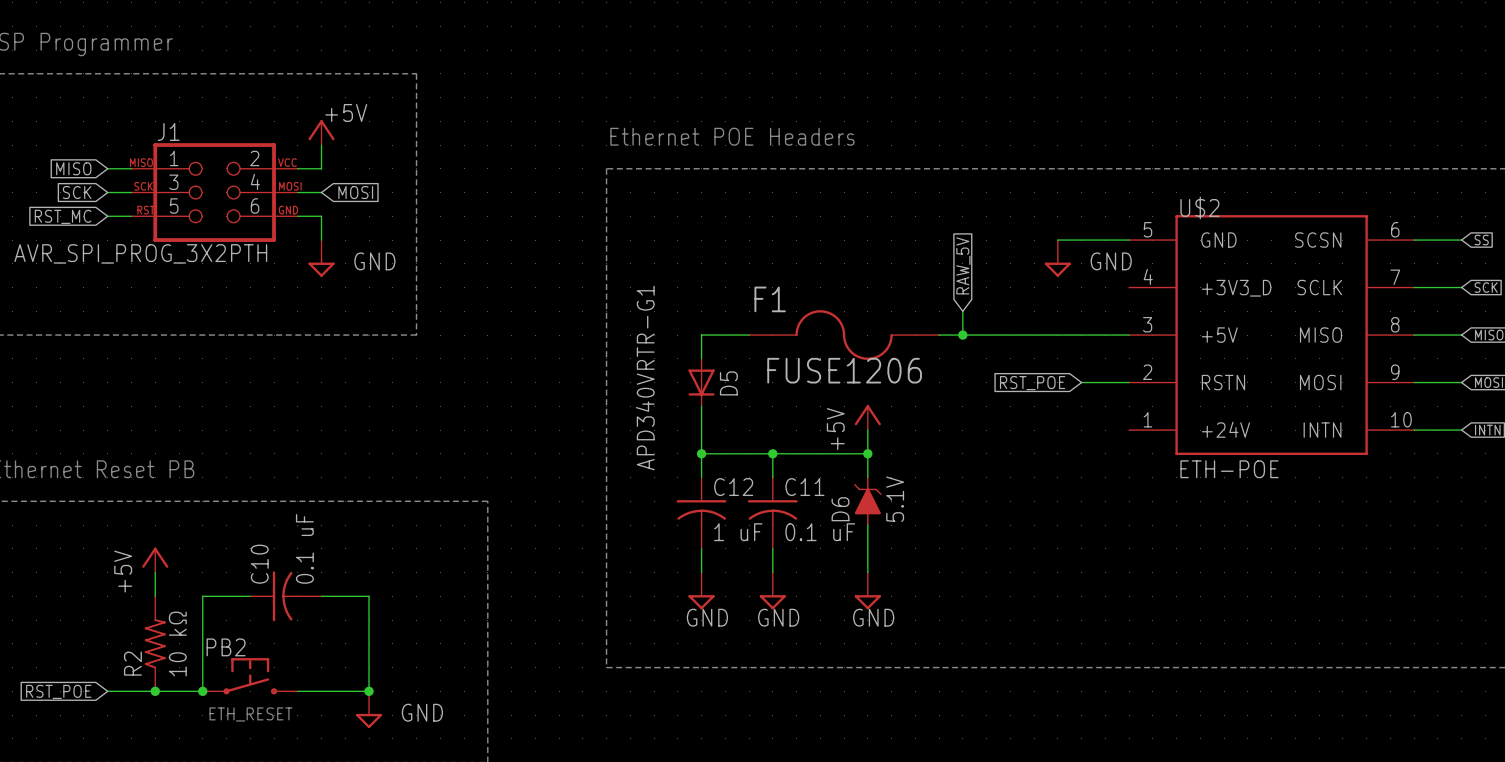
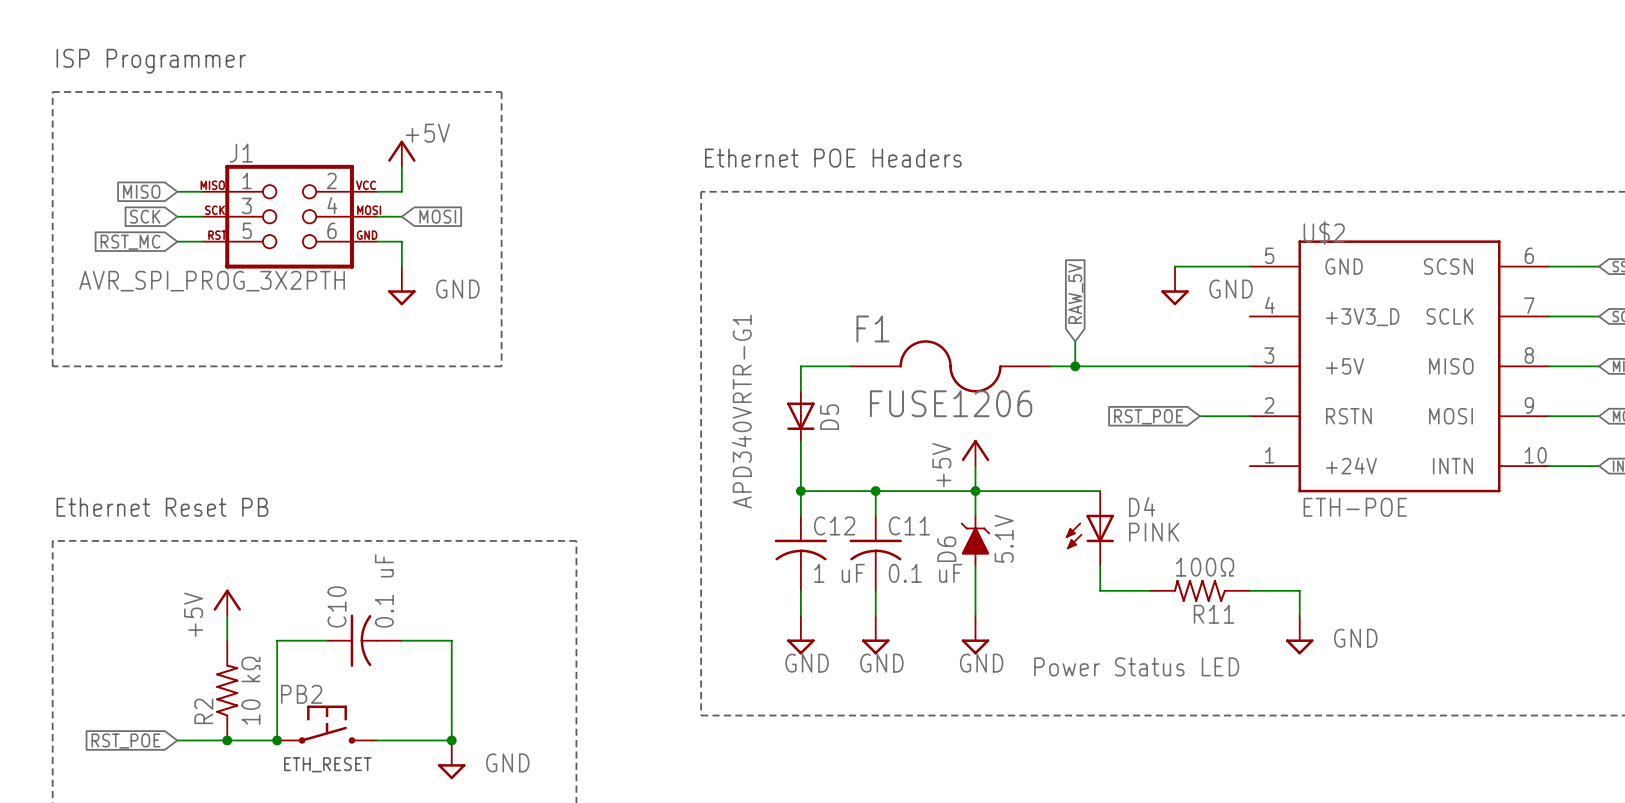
wire: none -> (975, 491) (1100, 491)
D4: none -> PINK (1089, 528)
wire: none -> (1100, 565) (1100, 590) (1150, 590)
R11: none -> 100Ω (1199, 590)
wire: none -> (1249, 590) (1299, 590) (1299, 615)
power symbol: none -> GND (1299, 635)
text: none -> Power Status LED (1136, 666)

